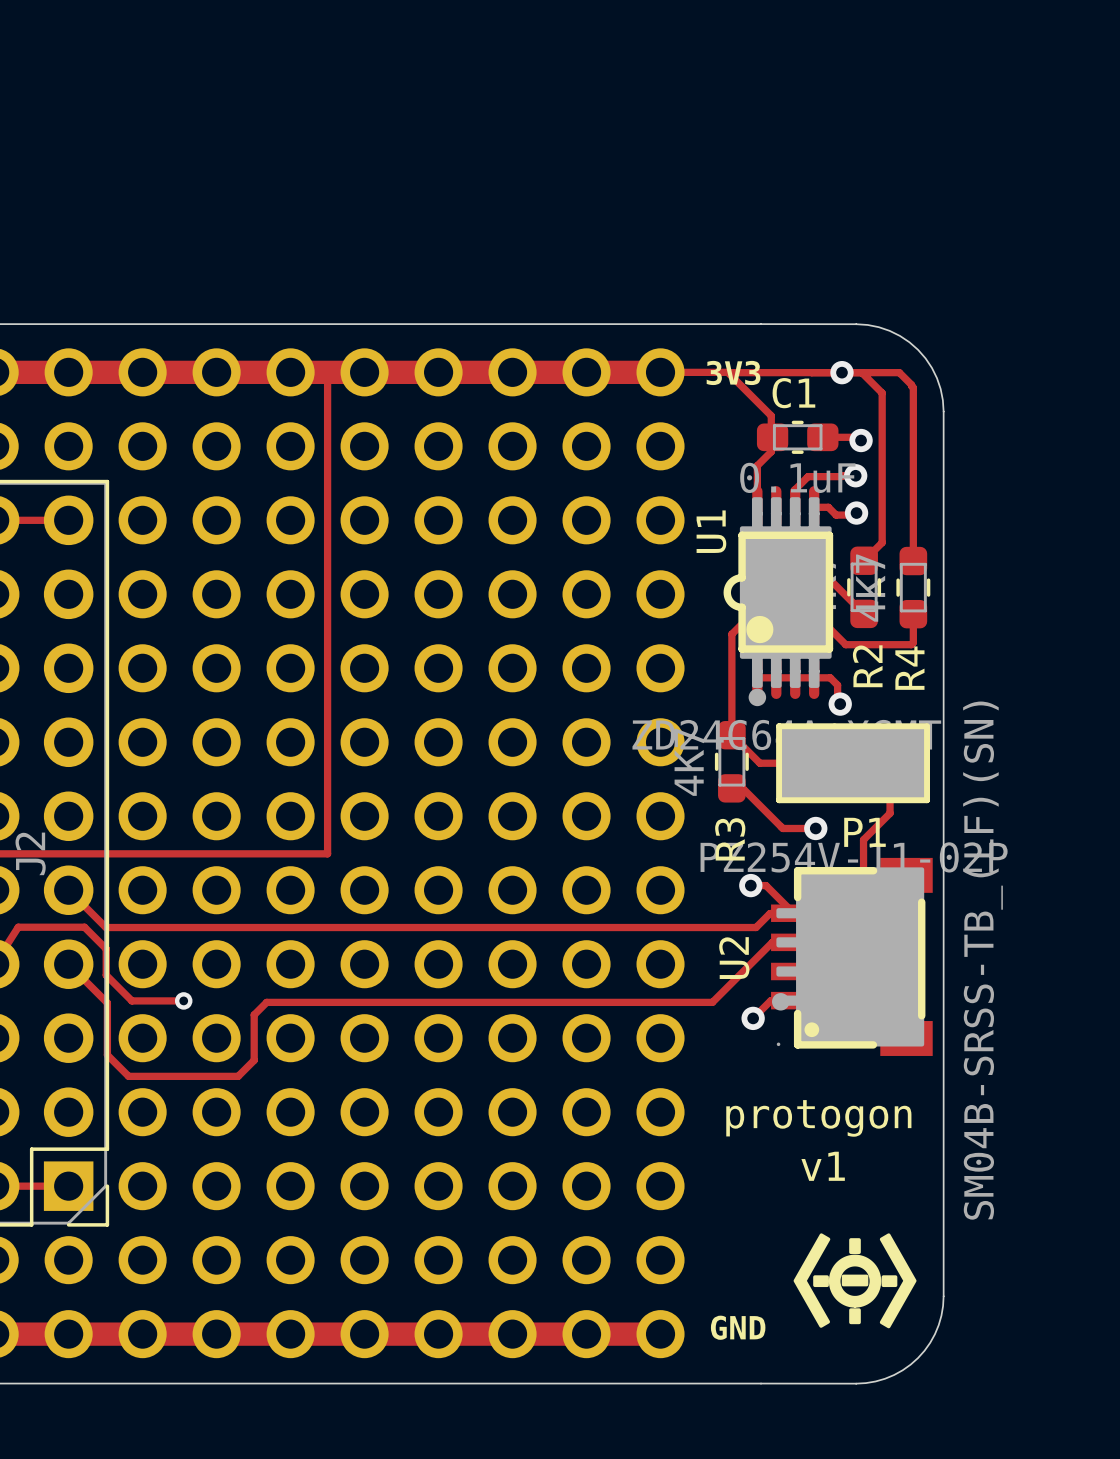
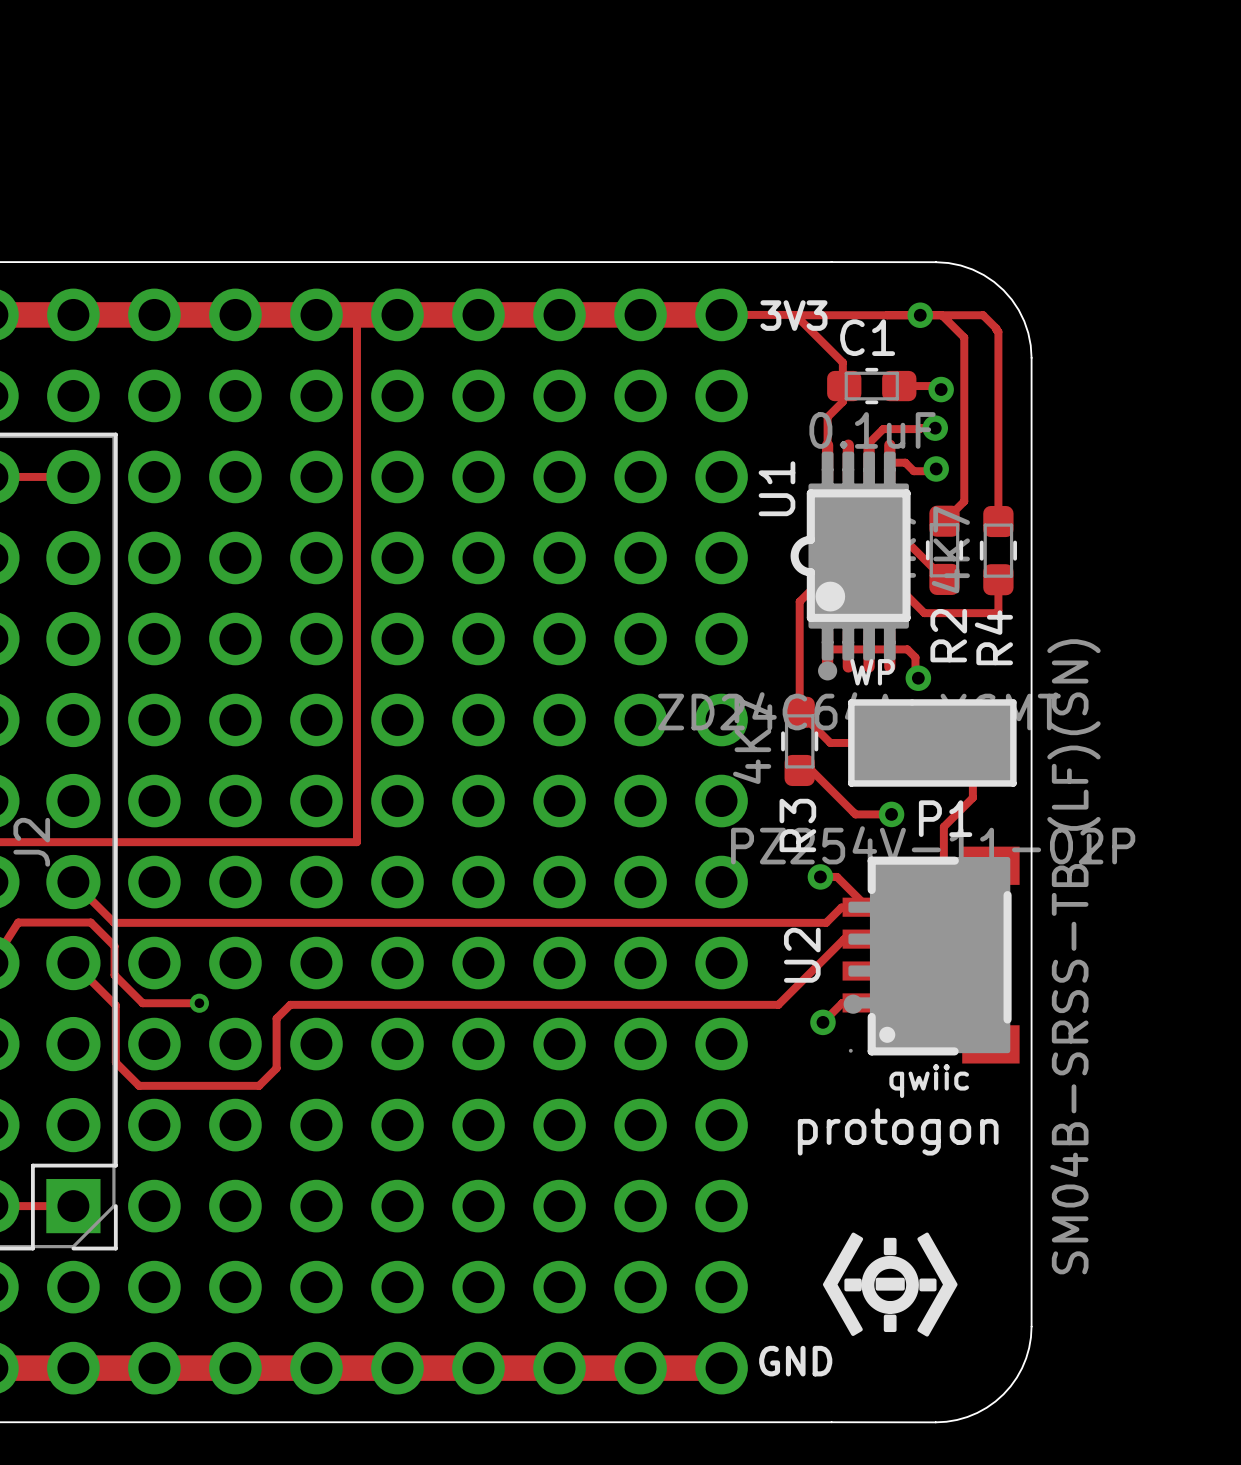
text: none -> WP (872, 672)
text: none -> qwiic (929, 1081)
text: v1 (823, 1166) -> none
drawing: none -> [844, 1237, 897, 1292]
drawing shape: [849, 1238, 861, 1255] -> [919, 1278, 937, 1292]
drawing shape: [813, 1275, 829, 1288] -> [883, 1314, 897, 1333]
drawing: [849, 1275, 898, 1325] -> none
drawing position: (811, 1280) -> (843, 1284)
drawing position: (855, 1280) -> (890, 1284)
drawing position: (898, 1280) -> (937, 1284)
drawing position: (855, 1281) -> (890, 1284)

